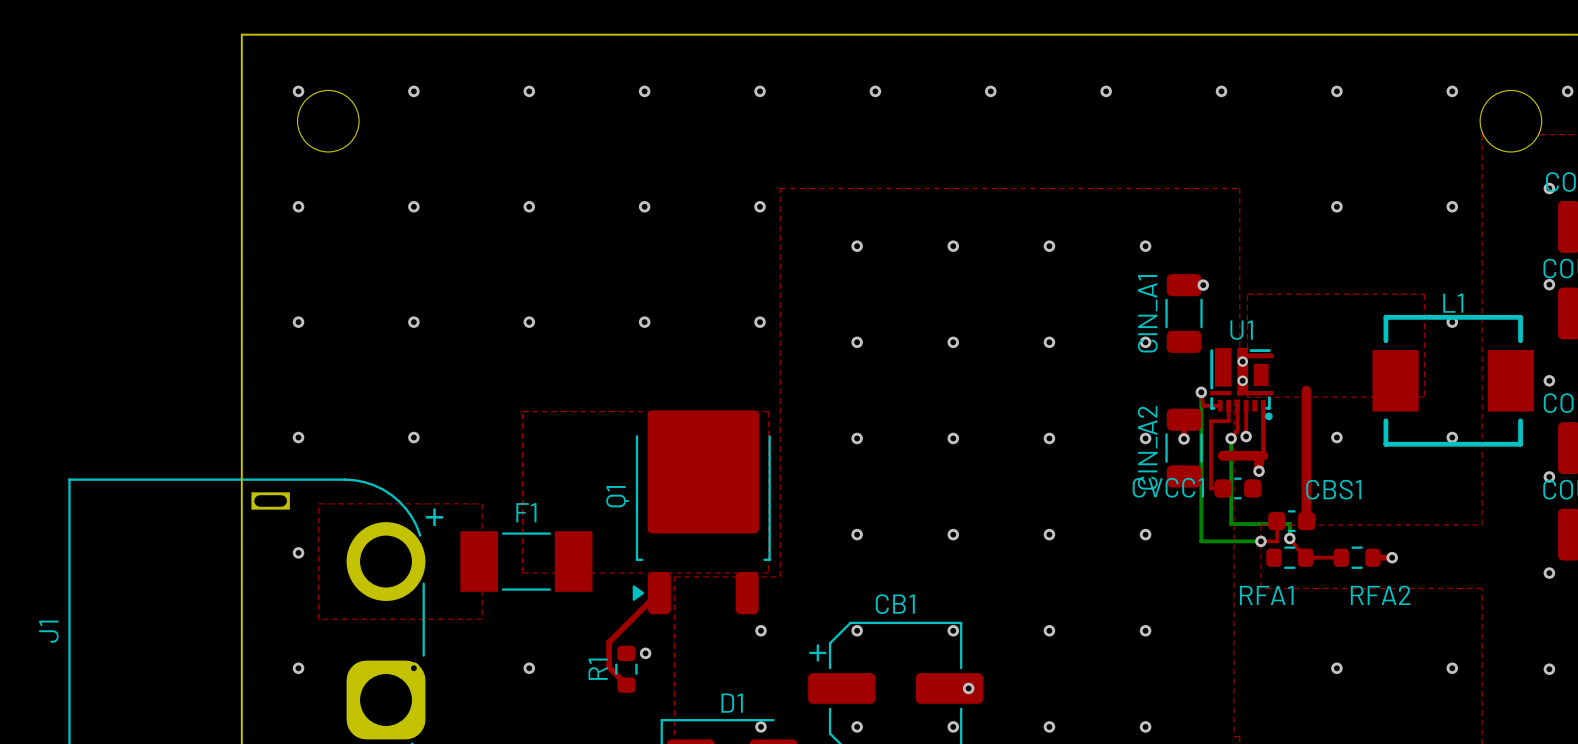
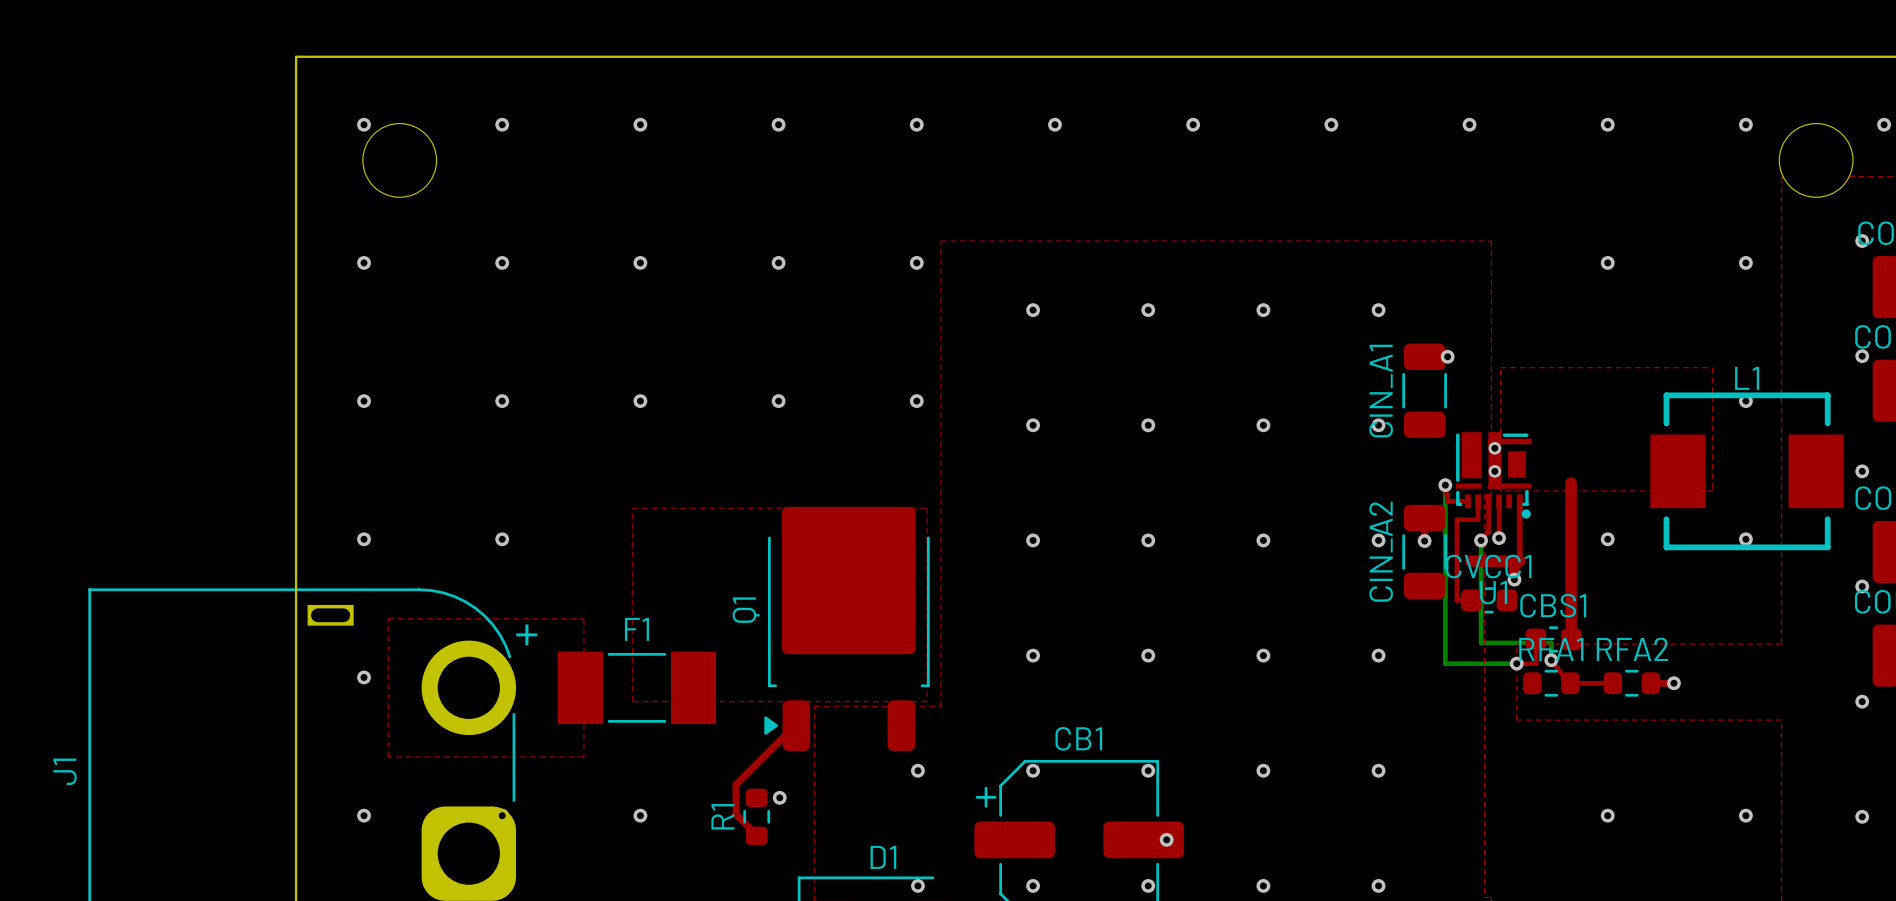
U1 name position: U1 (1241, 330) -> U1 (1493, 592)
CVCC1 name position: CVCC1 (1168, 487) -> CVCC1 (1488, 566)
CBS1 name position: CBS1 (1333, 489) -> CBS1 (1553, 605)
RFA1 name position: RFA1 (1266, 595) -> RFA1 (1551, 649)
RFA2 name position: RFA2 (1380, 595) -> RFA2 (1632, 649)

